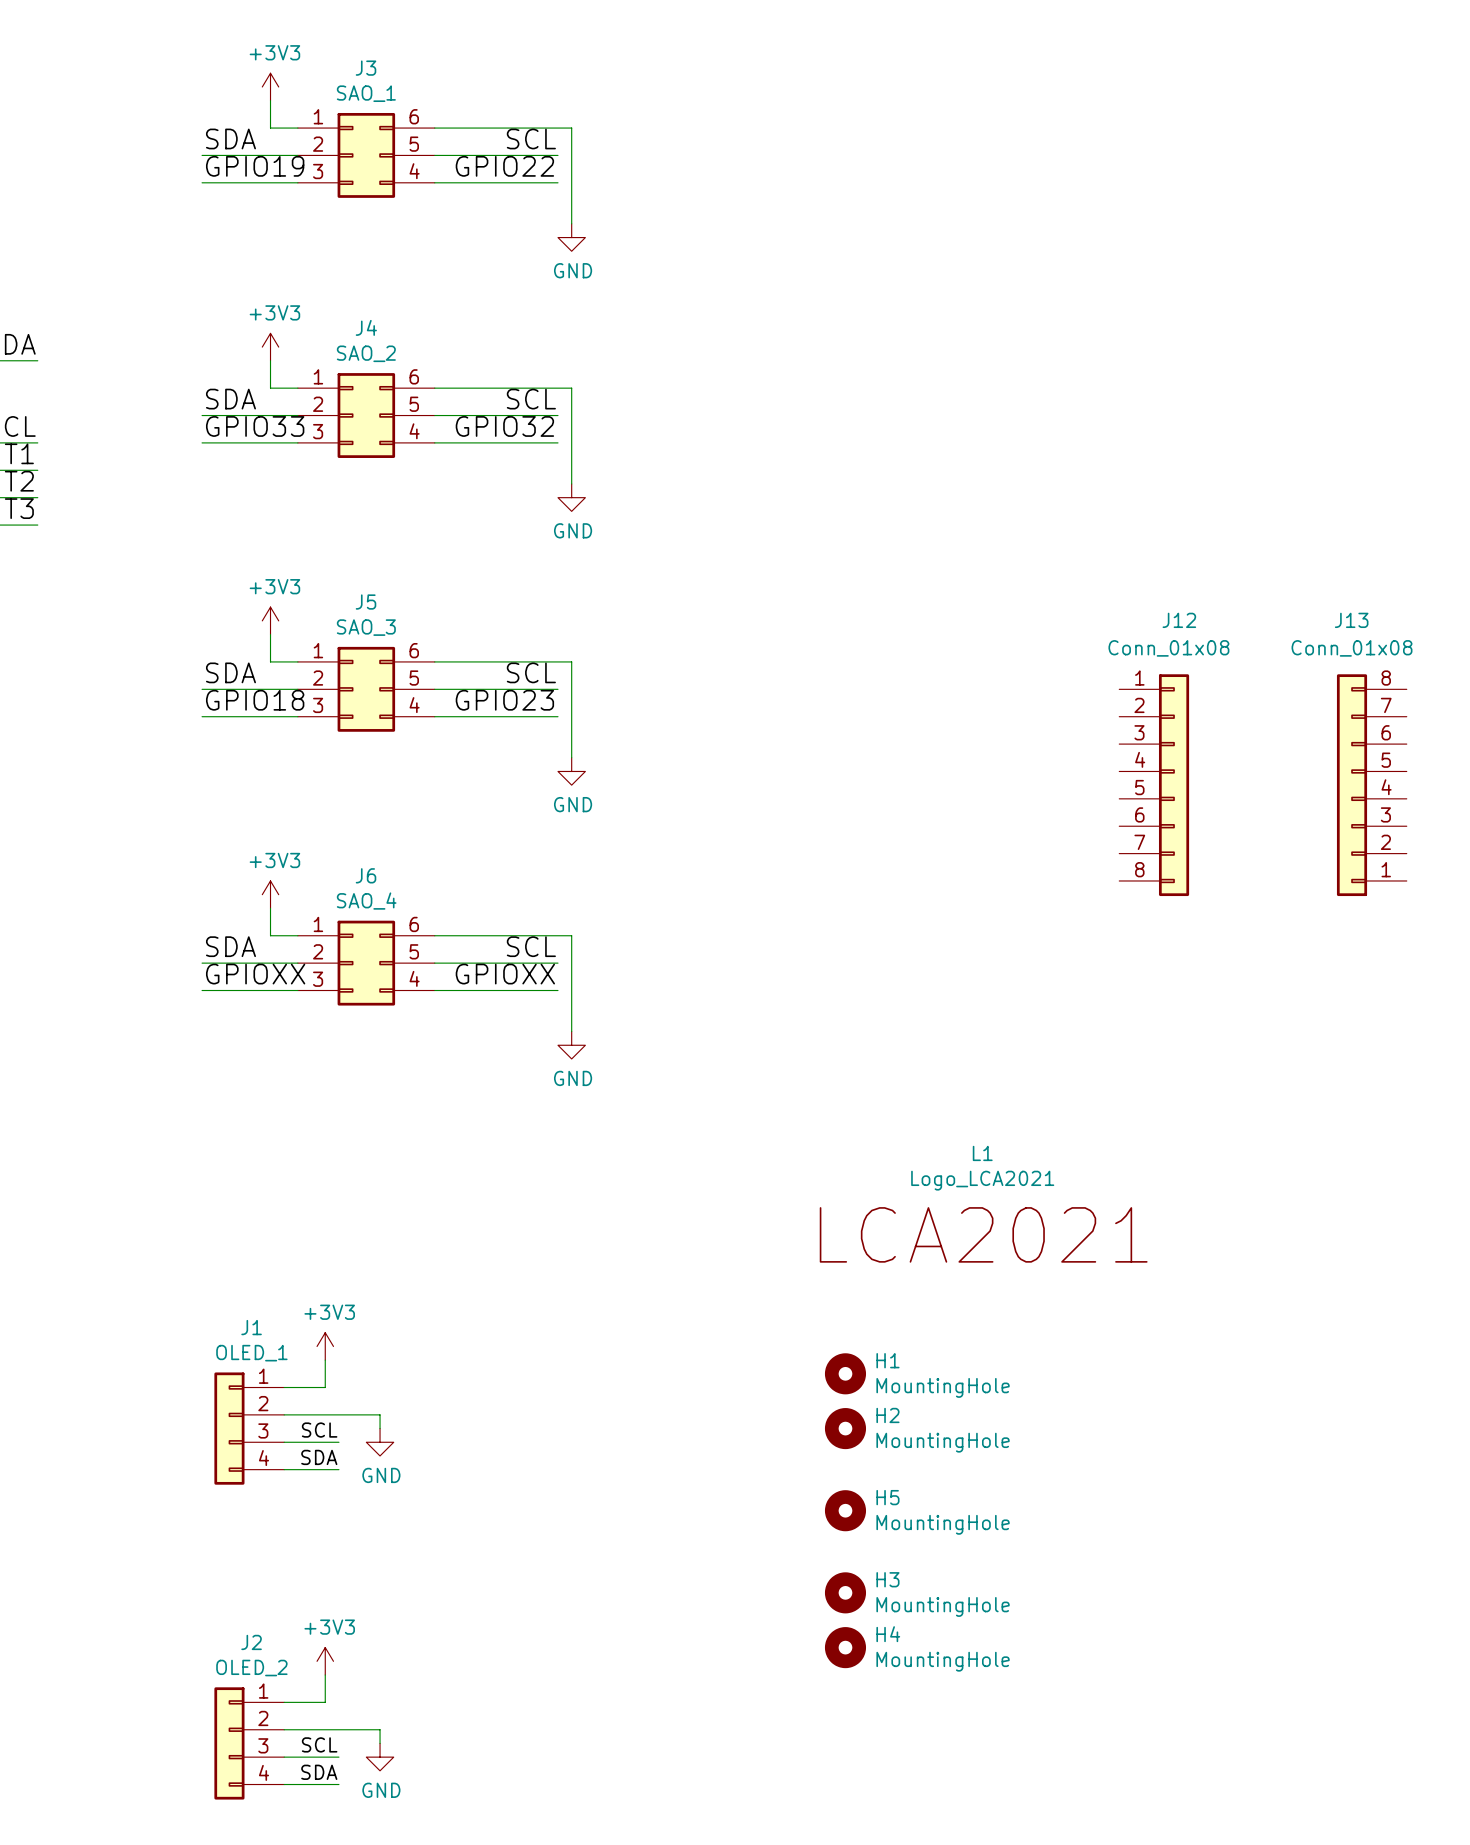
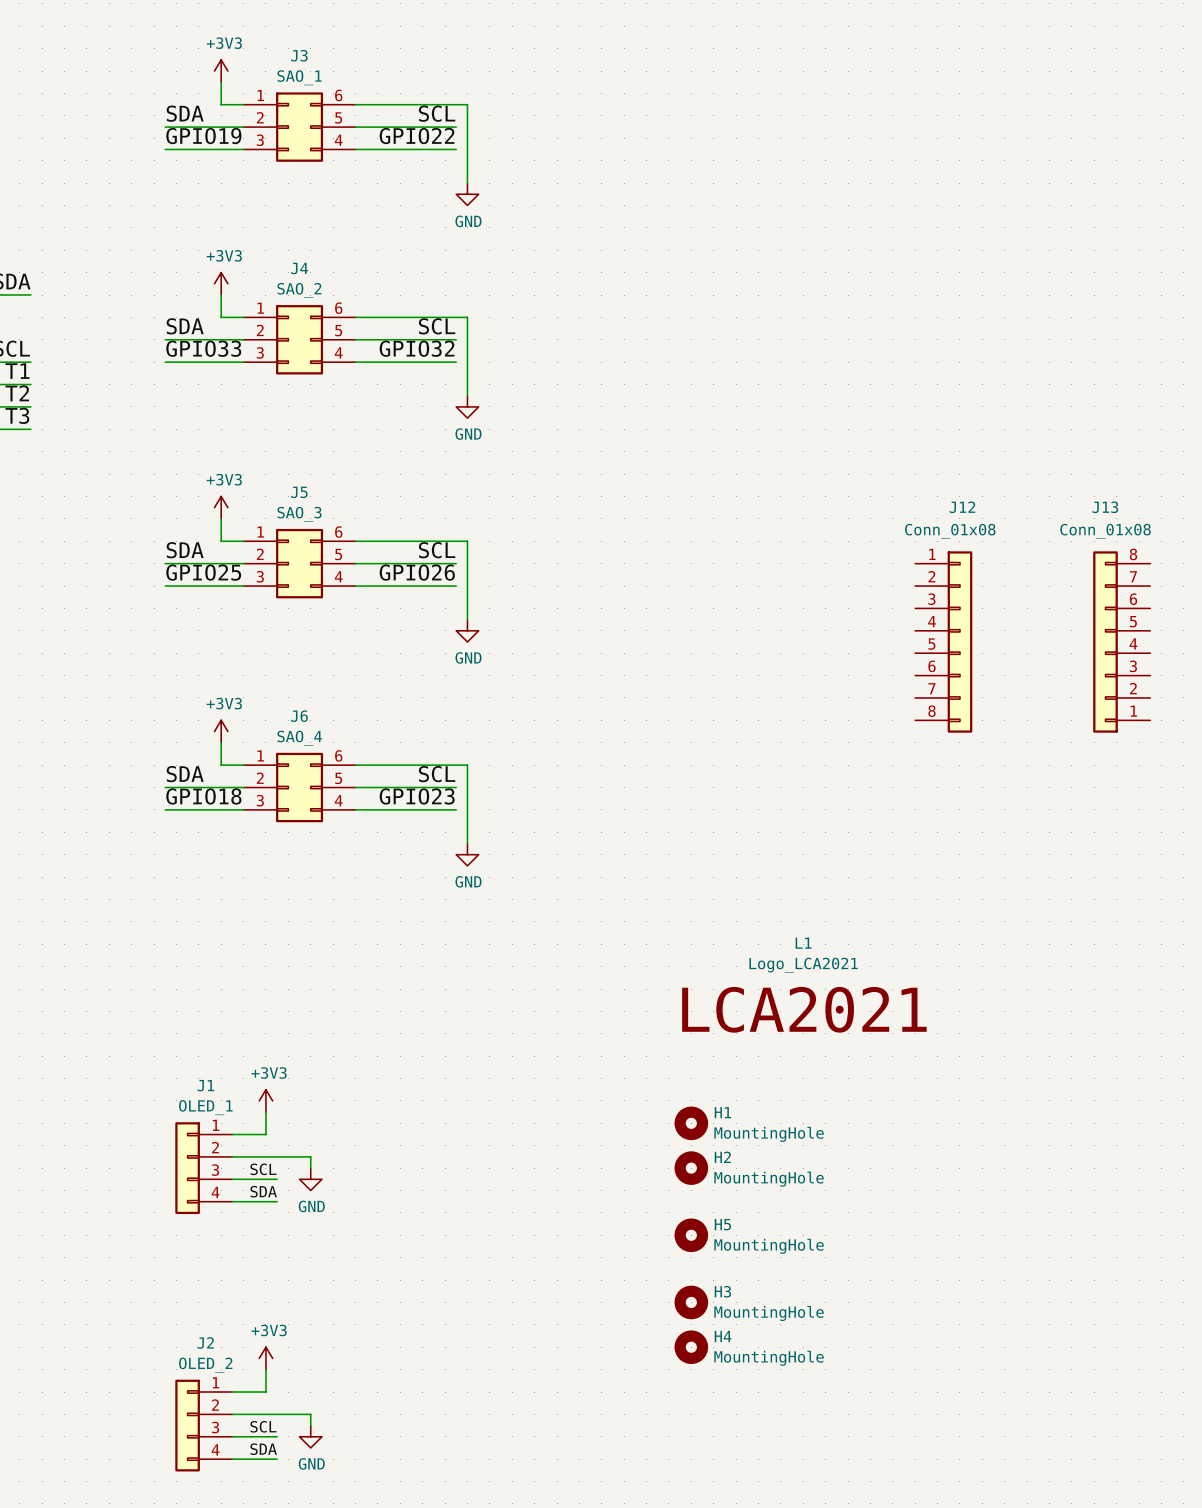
label: GPIO18 (255, 700) -> GPIO25 (203, 572)
label: GPIO23 (504, 700) -> GPIO26 (417, 572)
label: GPIOXX (255, 974) -> GPIO18 (203, 796)
label: GPIOXX (505, 974) -> GPIO23 (417, 796)

